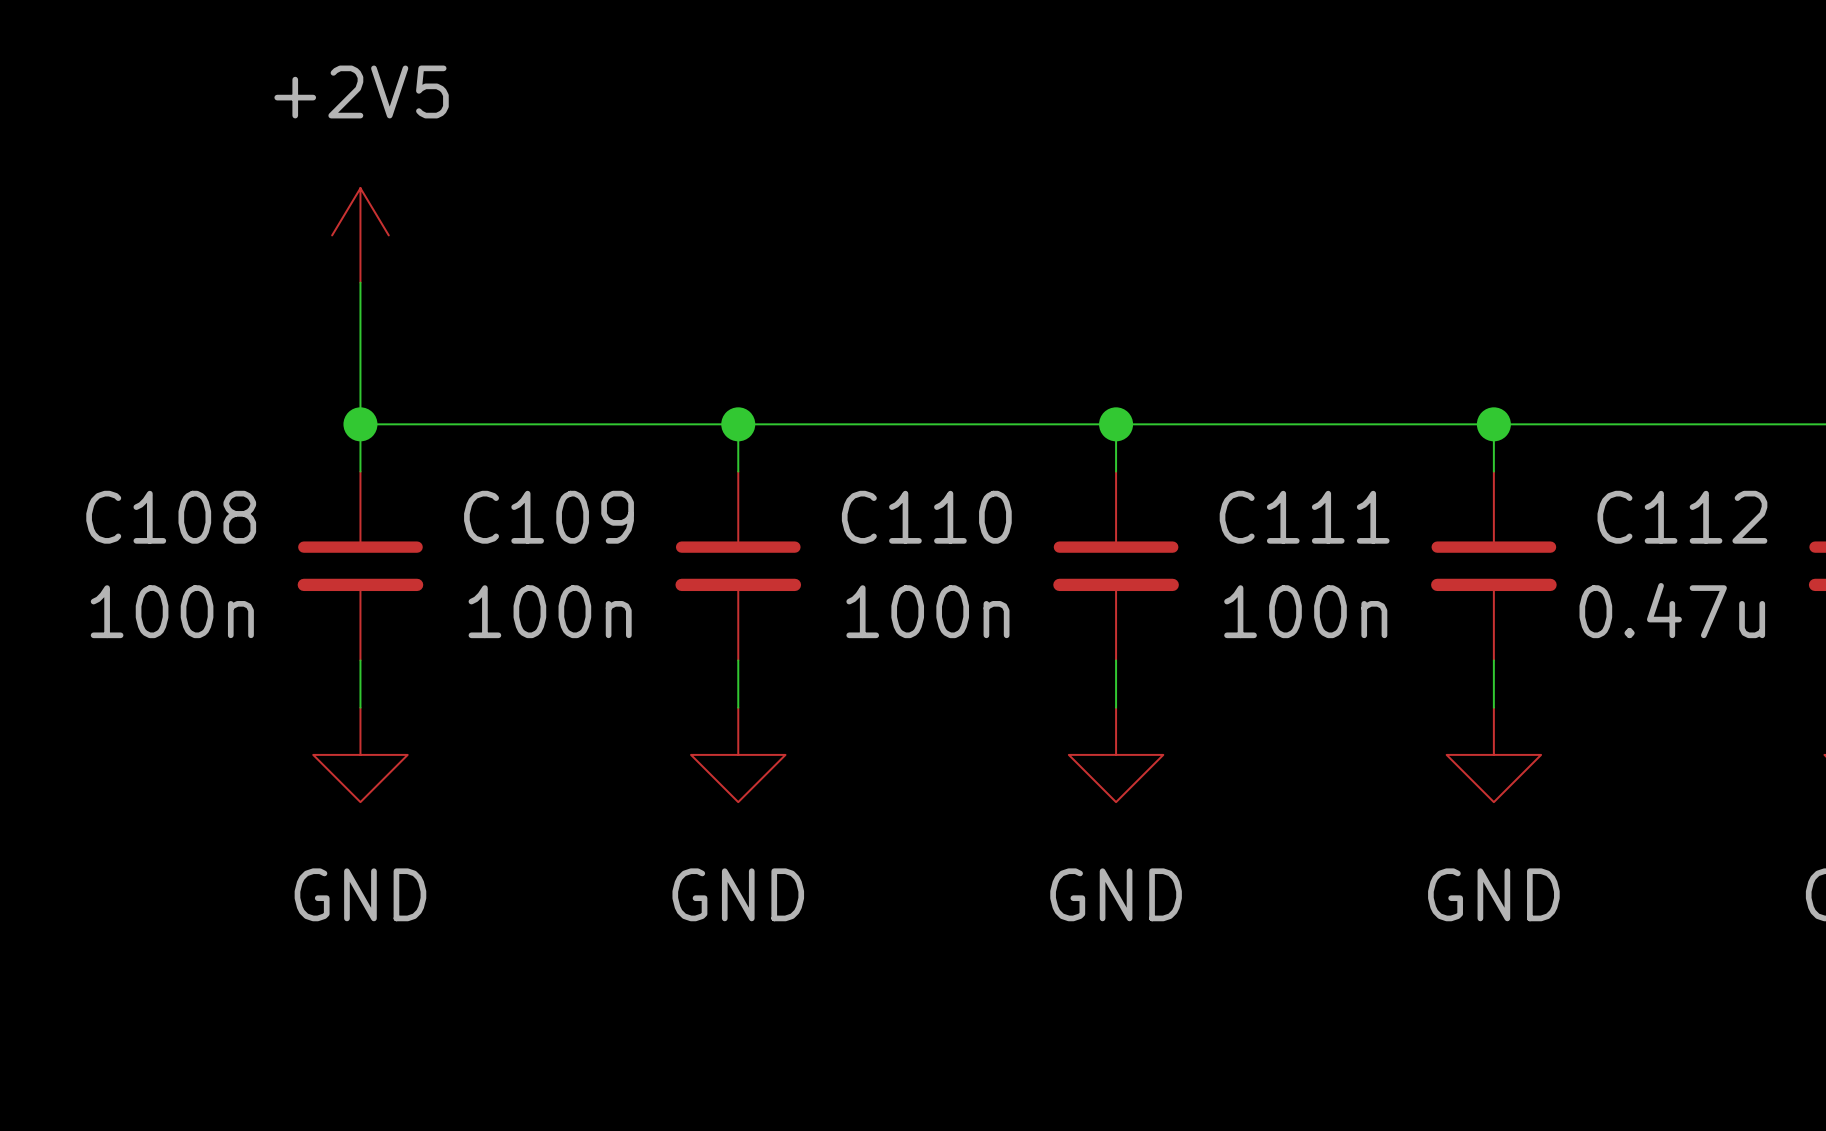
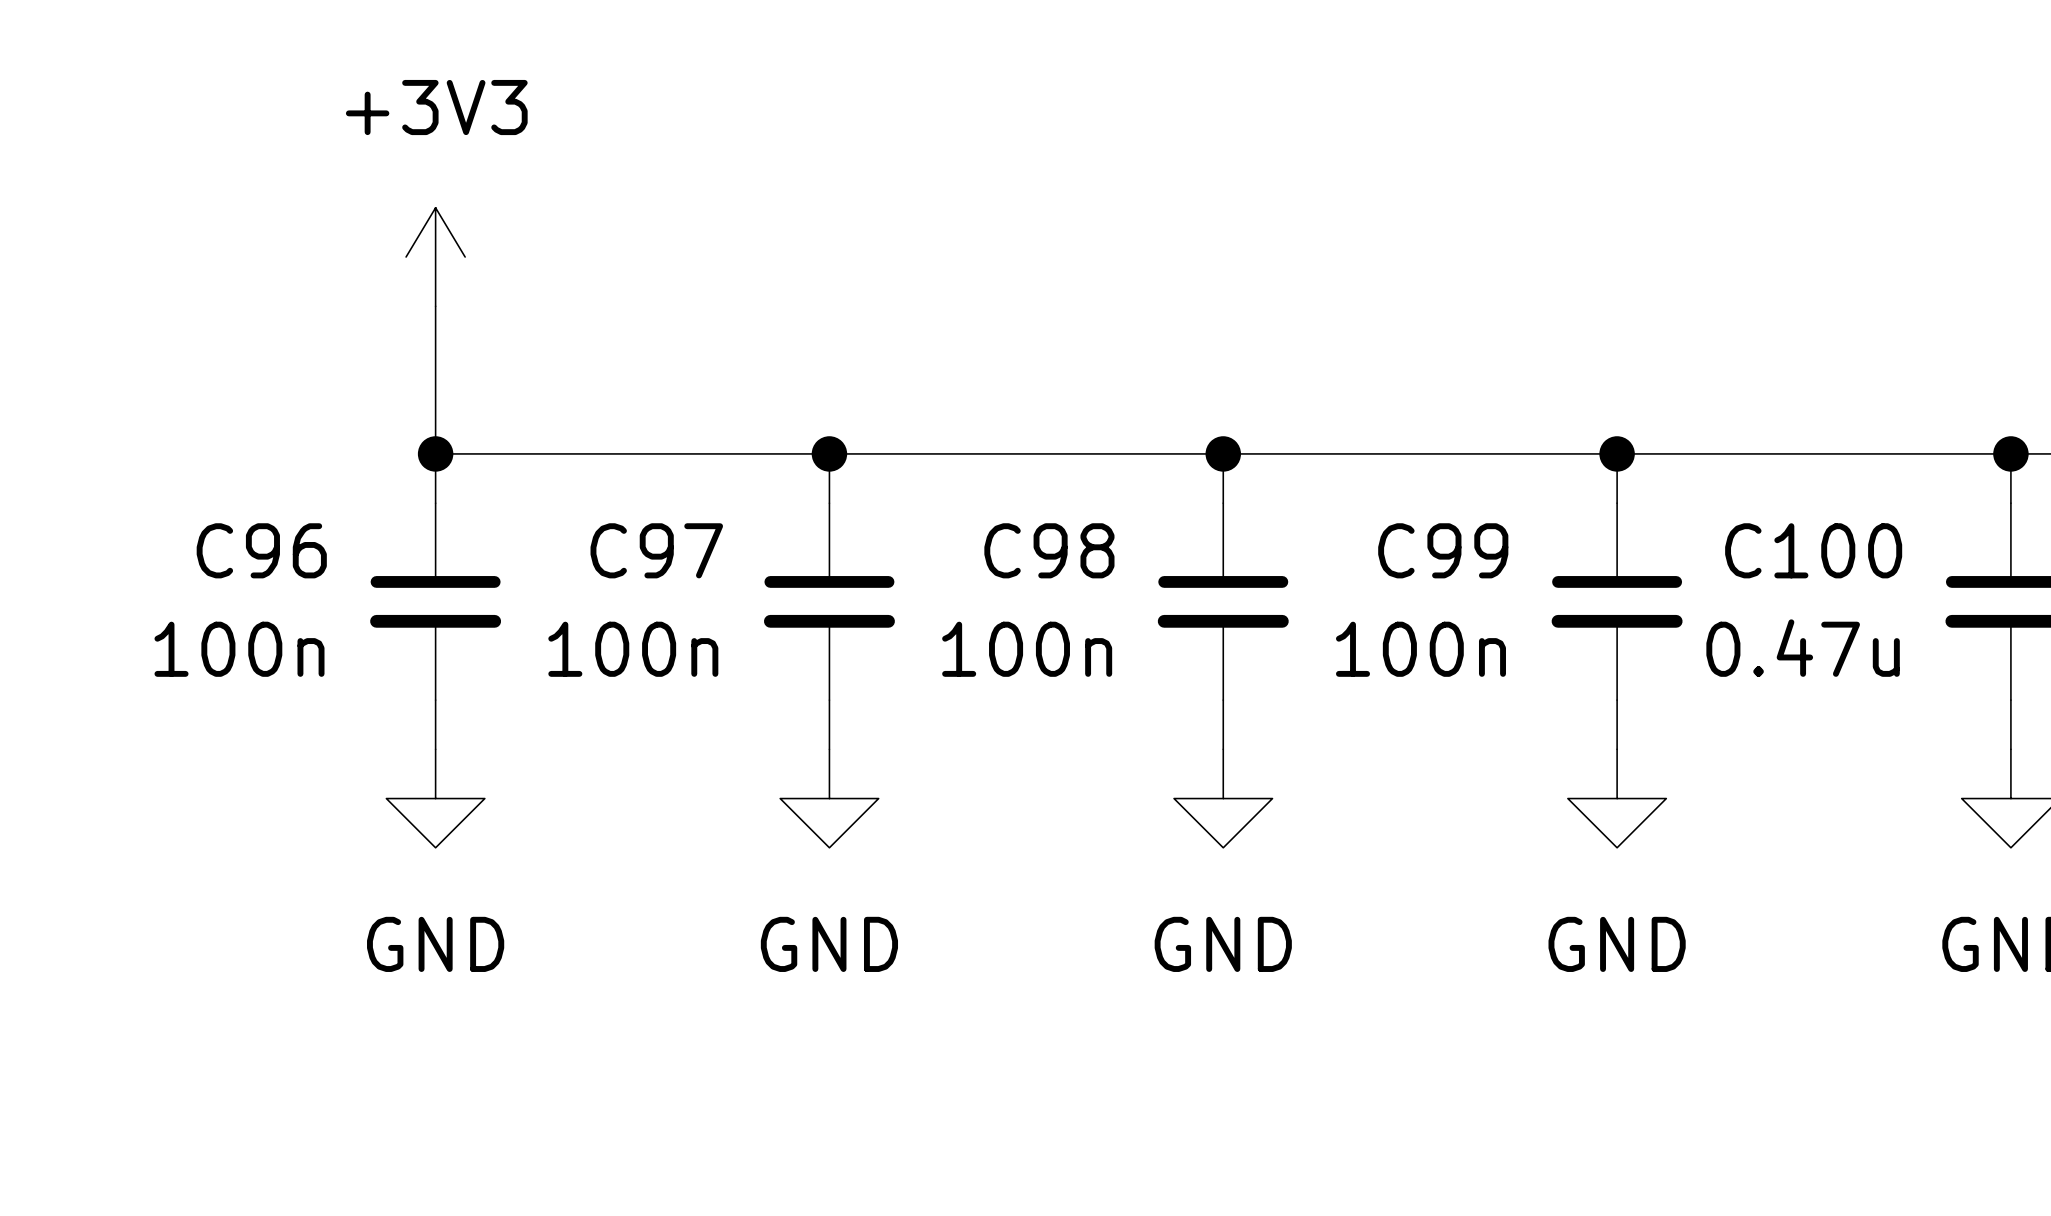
power symbol: +2V5 (360, 235) -> +3V3 (435, 257)
C108 name: C108 (171, 517) -> C96 (261, 550)
C109 name: C109 (549, 517) -> C97 (656, 550)
C110 name: C110 (926, 517) -> C98 (1049, 550)
C111 name: C111 (1304, 517) -> C99 (1443, 550)
C112 name: C112 (1682, 517) -> C100 (1813, 550)

